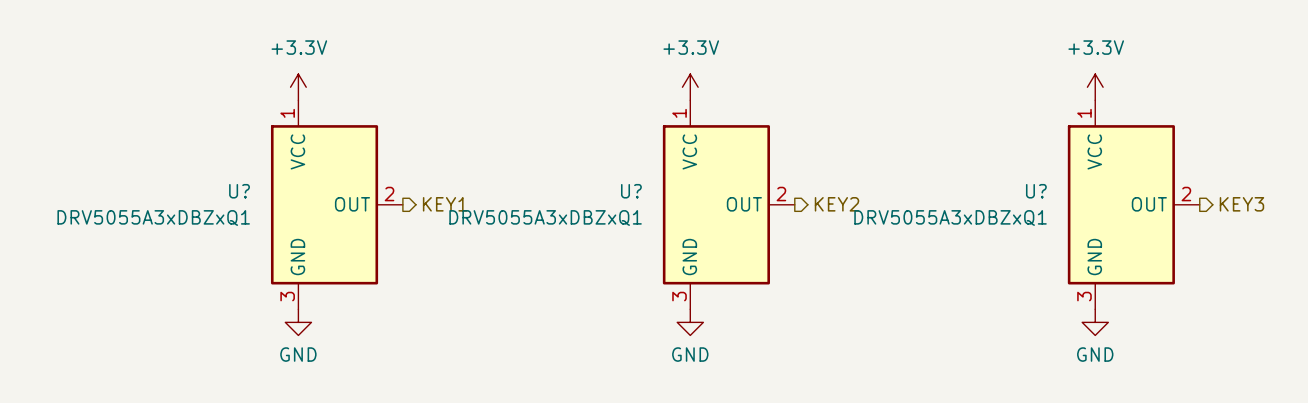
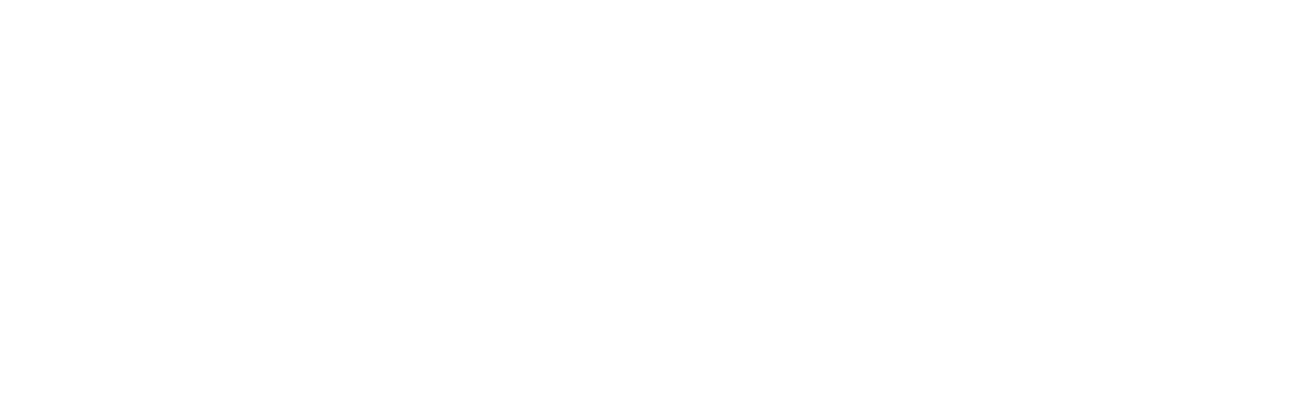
power symbol: +3.3V (298, 87) -> none
power symbol: +3.3V (690, 87) -> none
power symbol: +3.3V (1095, 87) -> none
U?: DRV5055A3xDBZxQ1 (336, 204) -> none
hierarchical label: KEY1 (445, 204) -> none
U?: DRV5055A3xDBZxQ1 (728, 204) -> none
hierarchical label: KEY2 (836, 204) -> none
U?: DRV5055A3xDBZxQ1 (1133, 204) -> none
hierarchical label: KEY3 (1241, 204) -> none
power symbol: GND (298, 322) -> none
power symbol: GND (690, 322) -> none
power symbol: GND (1095, 322) -> none

